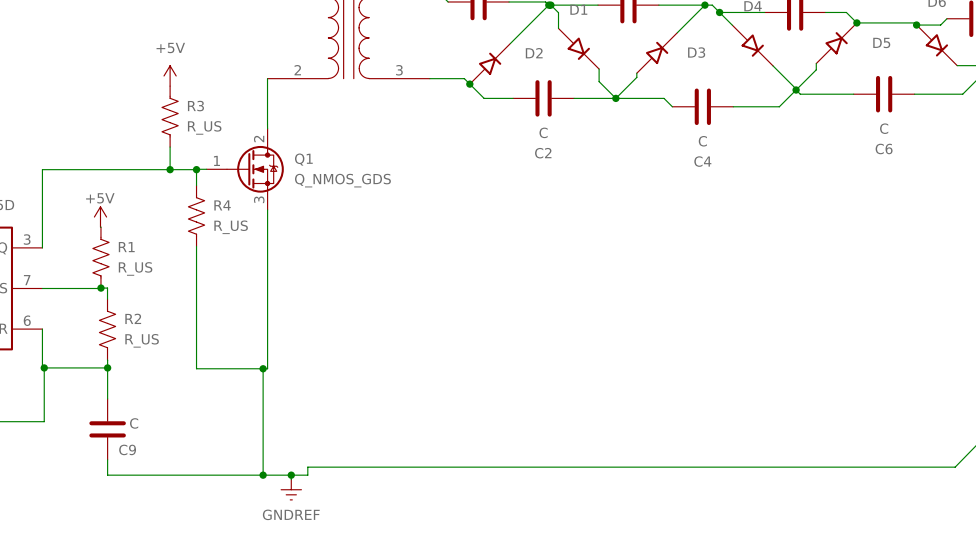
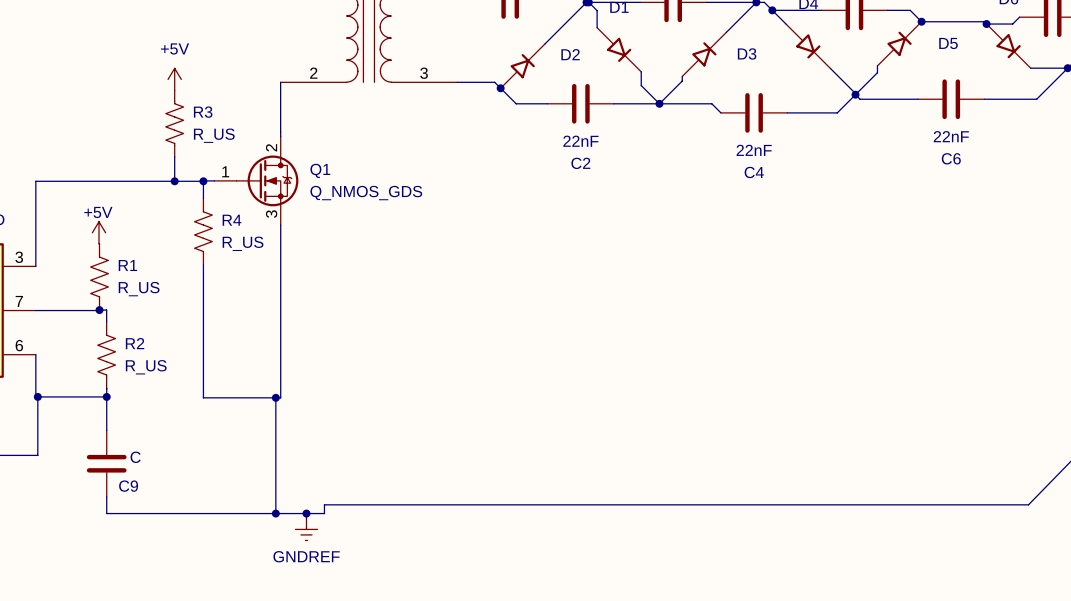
C6 value: C (884, 128) -> 22nF (951, 136)
C2 value: C (543, 132) -> 22nF (580, 141)
C4 value: C (702, 141) -> 22nF (754, 150)

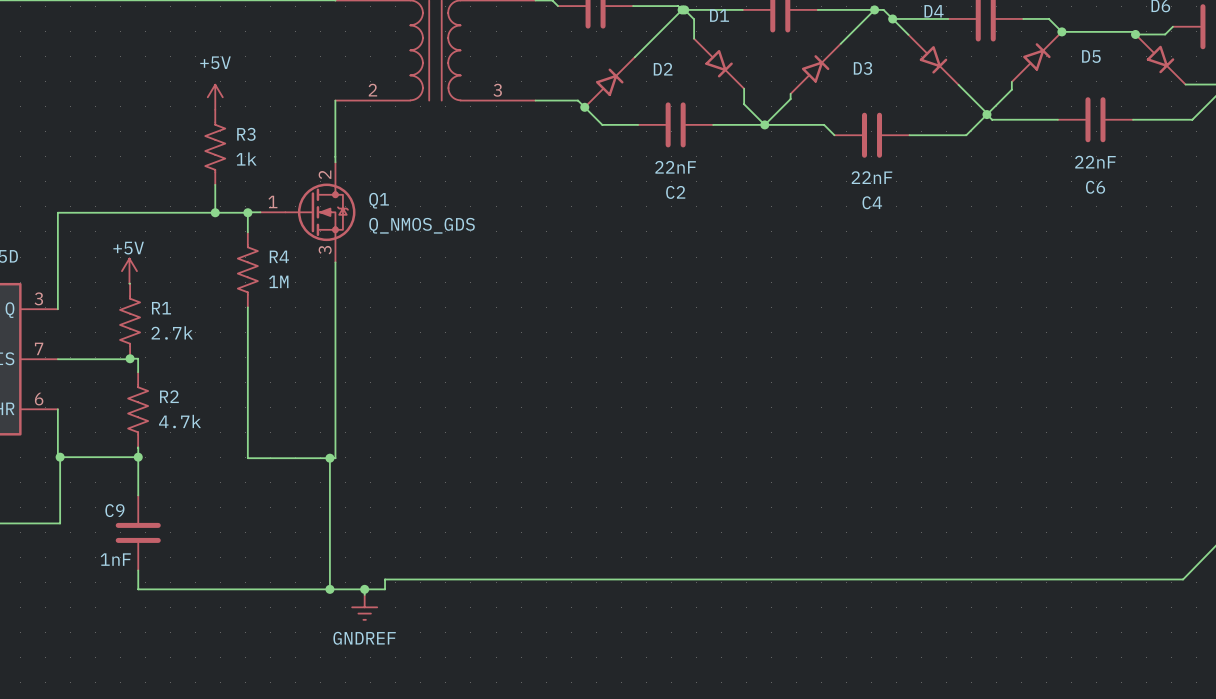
R3 value: R_US (214, 135) -> 1k (246, 158)
R4 value: R_US (243, 243) -> 1M (278, 281)
R1 value: R_US (139, 289) -> 2.7k (172, 332)
R2 value: R_US (146, 367) -> 4.7k (180, 421)
C9 value: C (135, 457) -> 1nF (115, 559)
C9 name position: C9 (128, 486) -> C9 (114, 510)

